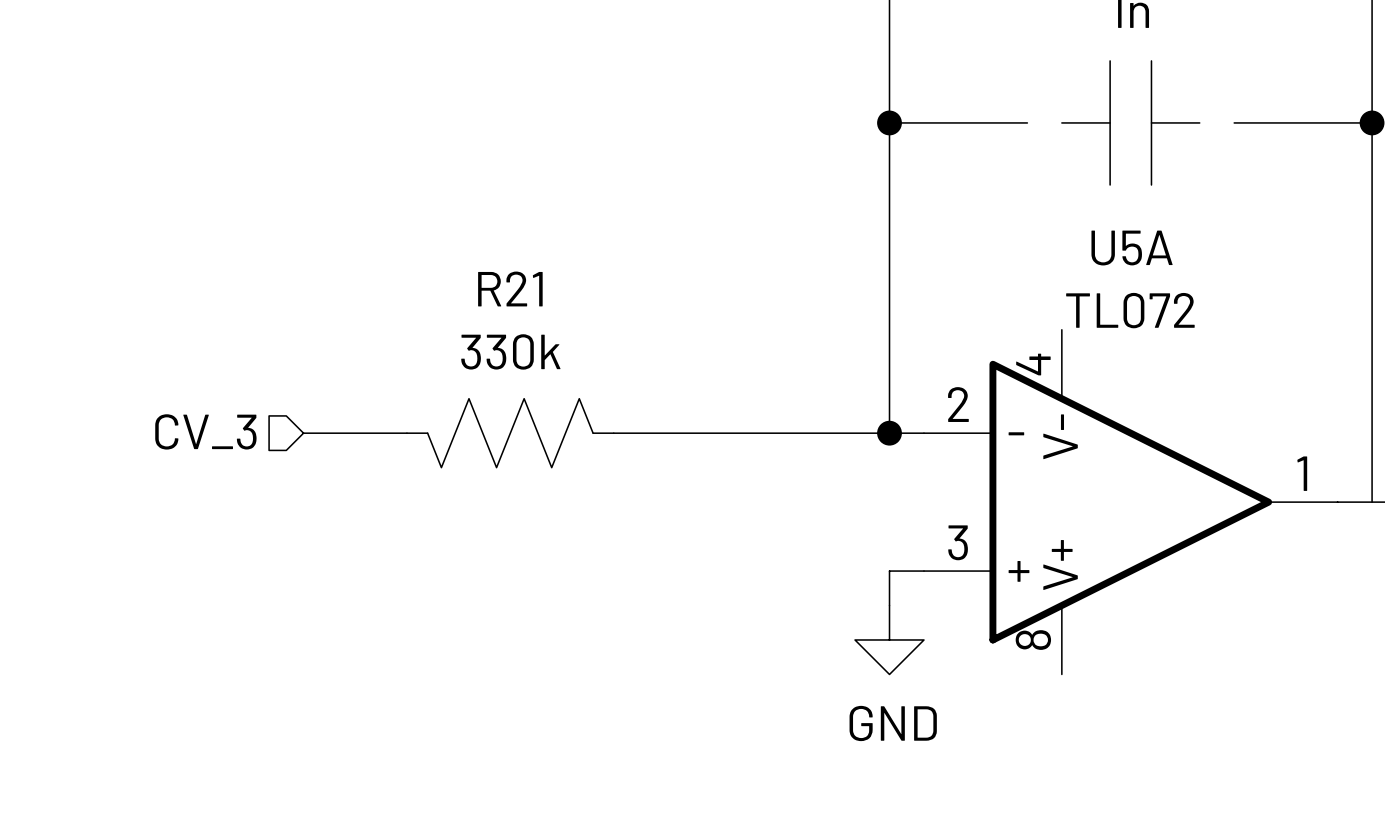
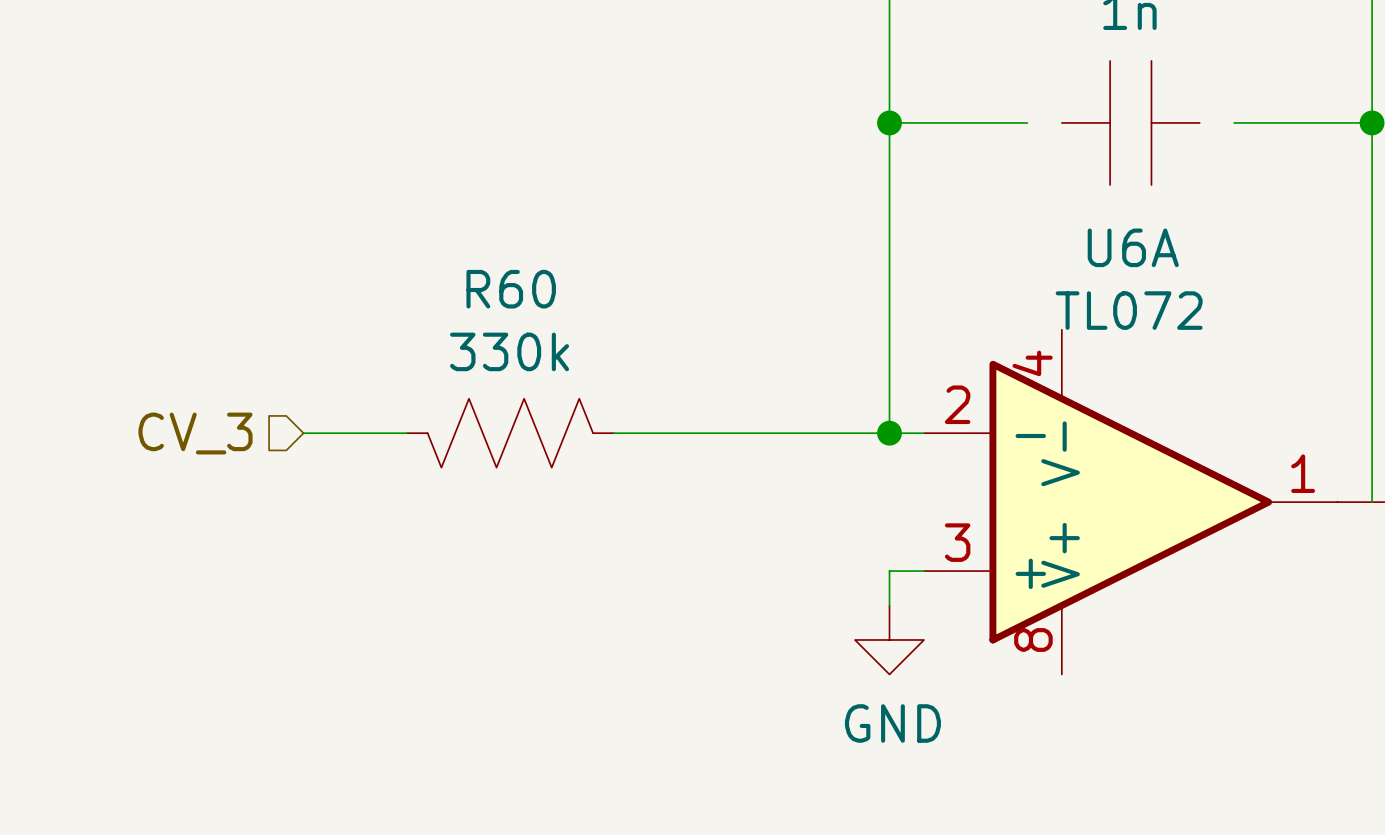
U5A name: U5A (1132, 248) -> U6A (1133, 247)
R21 name: R21 (510, 288) -> R60 (511, 289)

